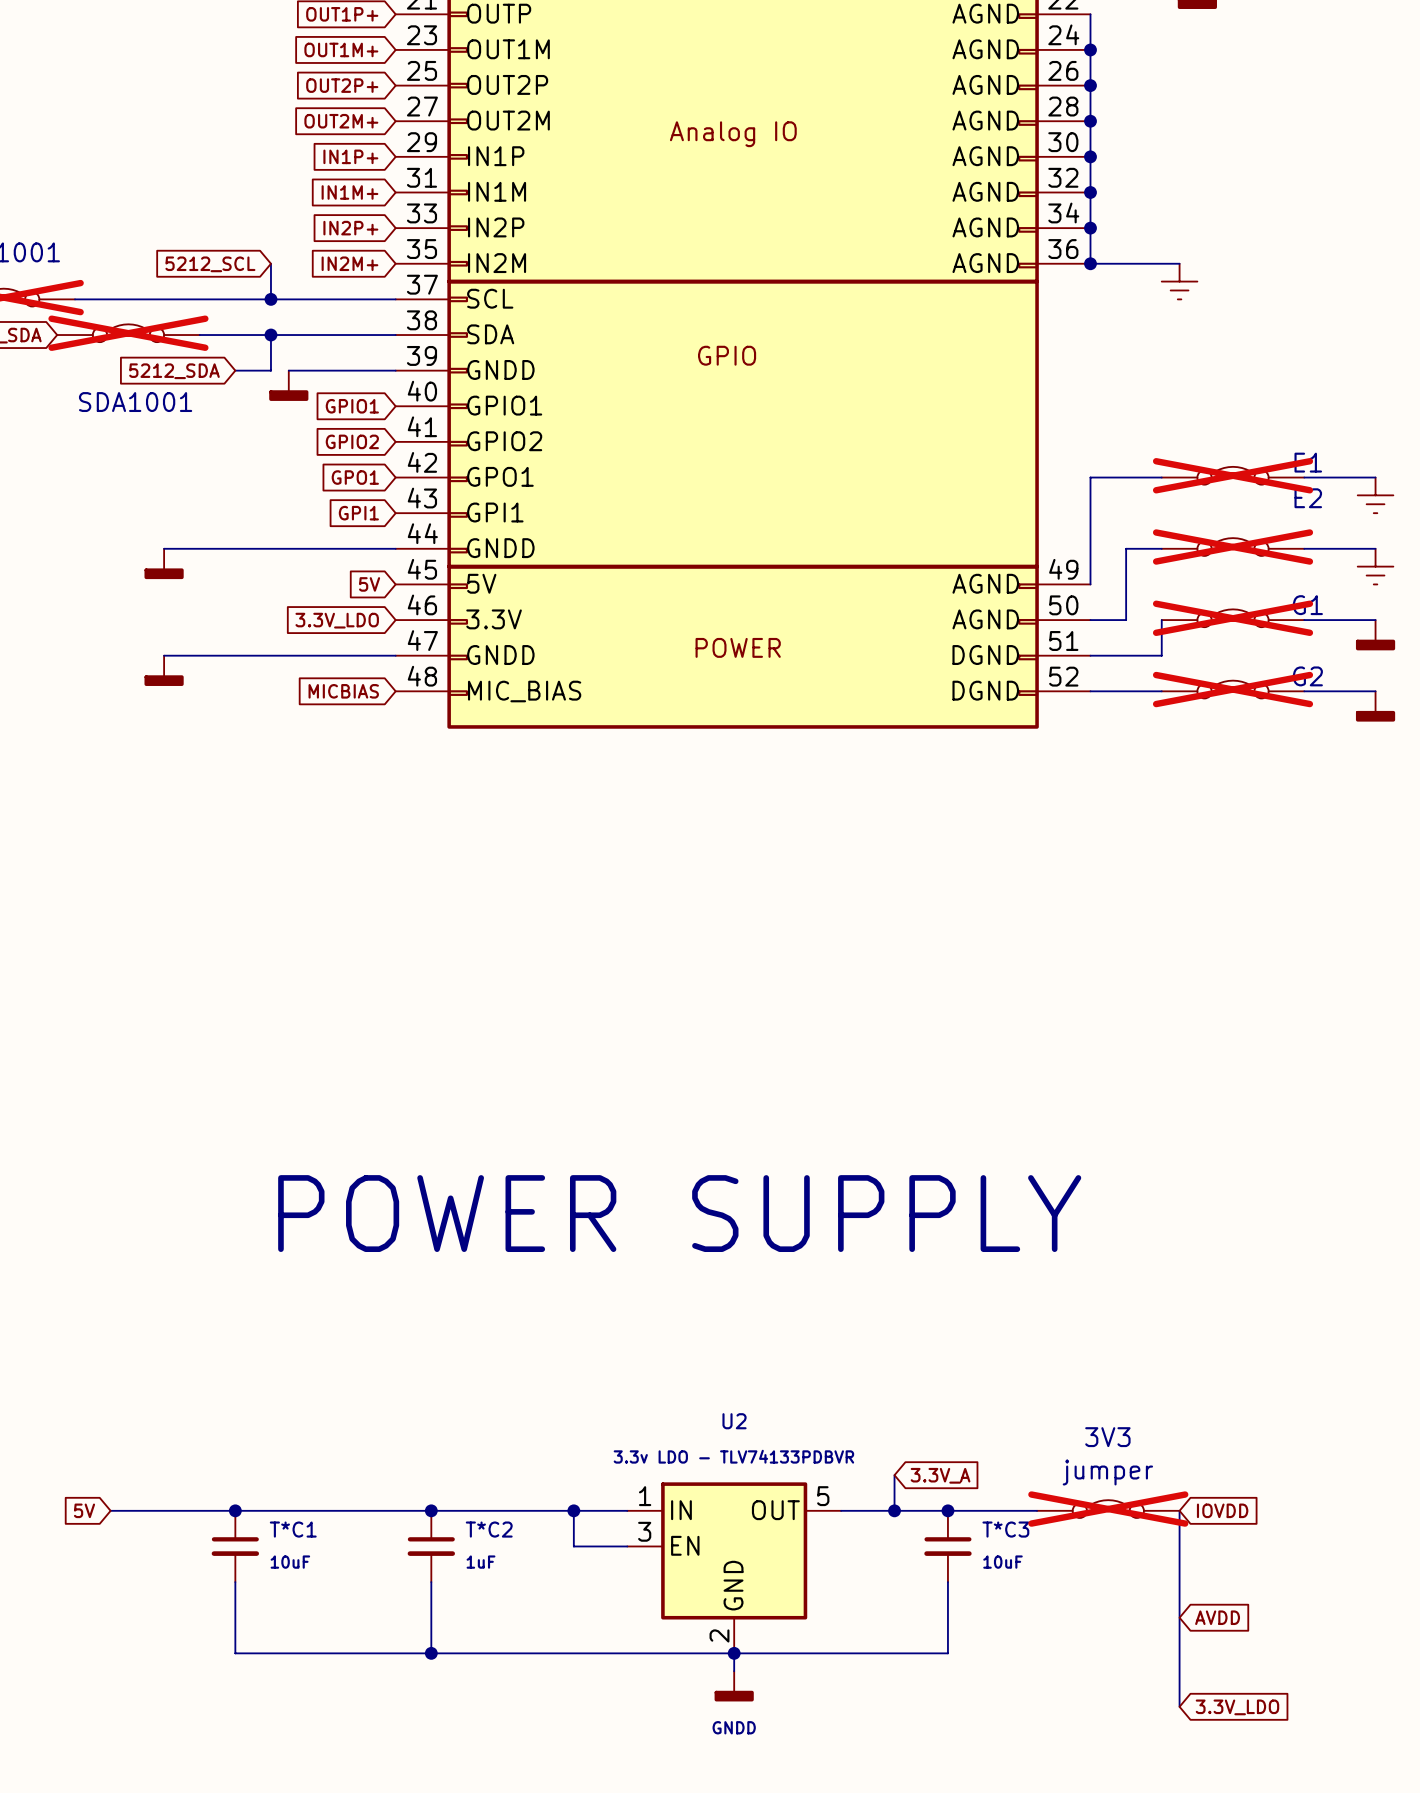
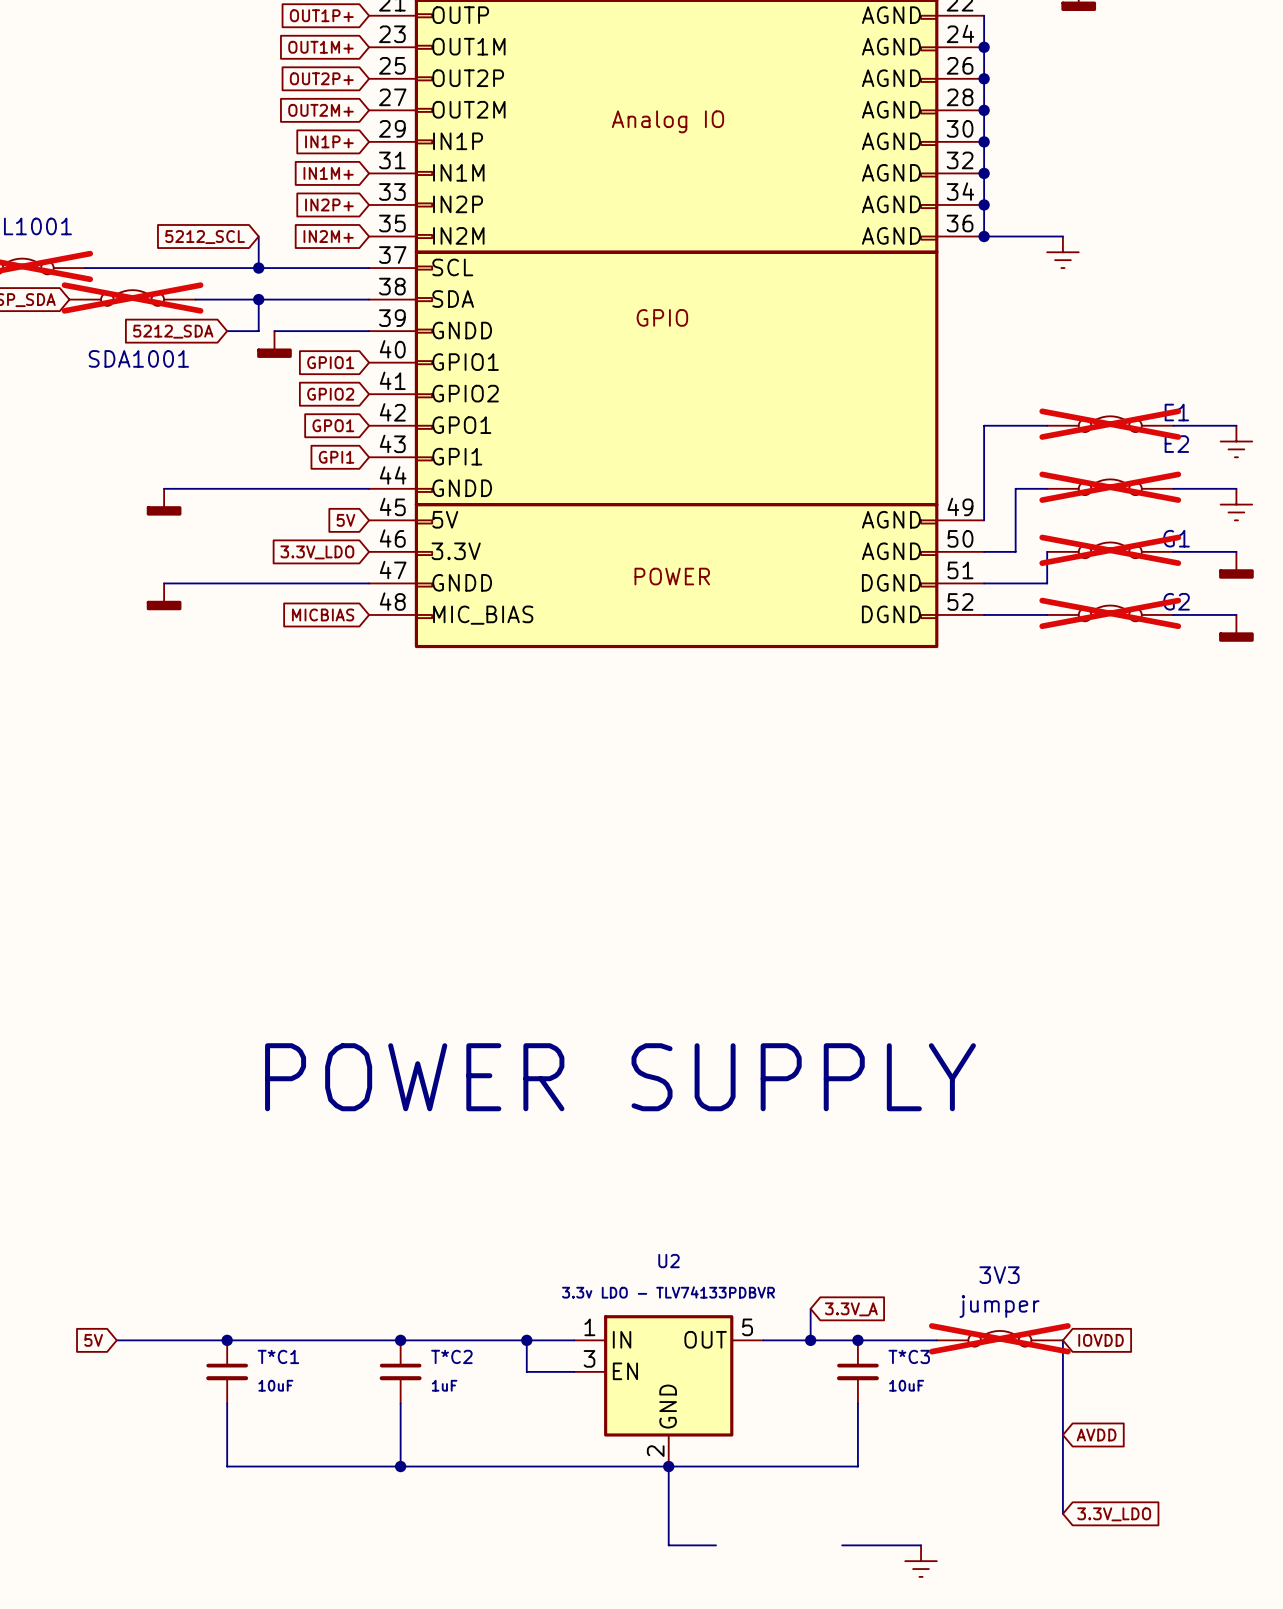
wire: none -> (668, 1482) (668, 1545) (716, 1545)
power symbol: GNDD (734, 1686) -> none
wire: none -> (842, 1545) (921, 1545)
power symbol: none -> (921, 1561)

